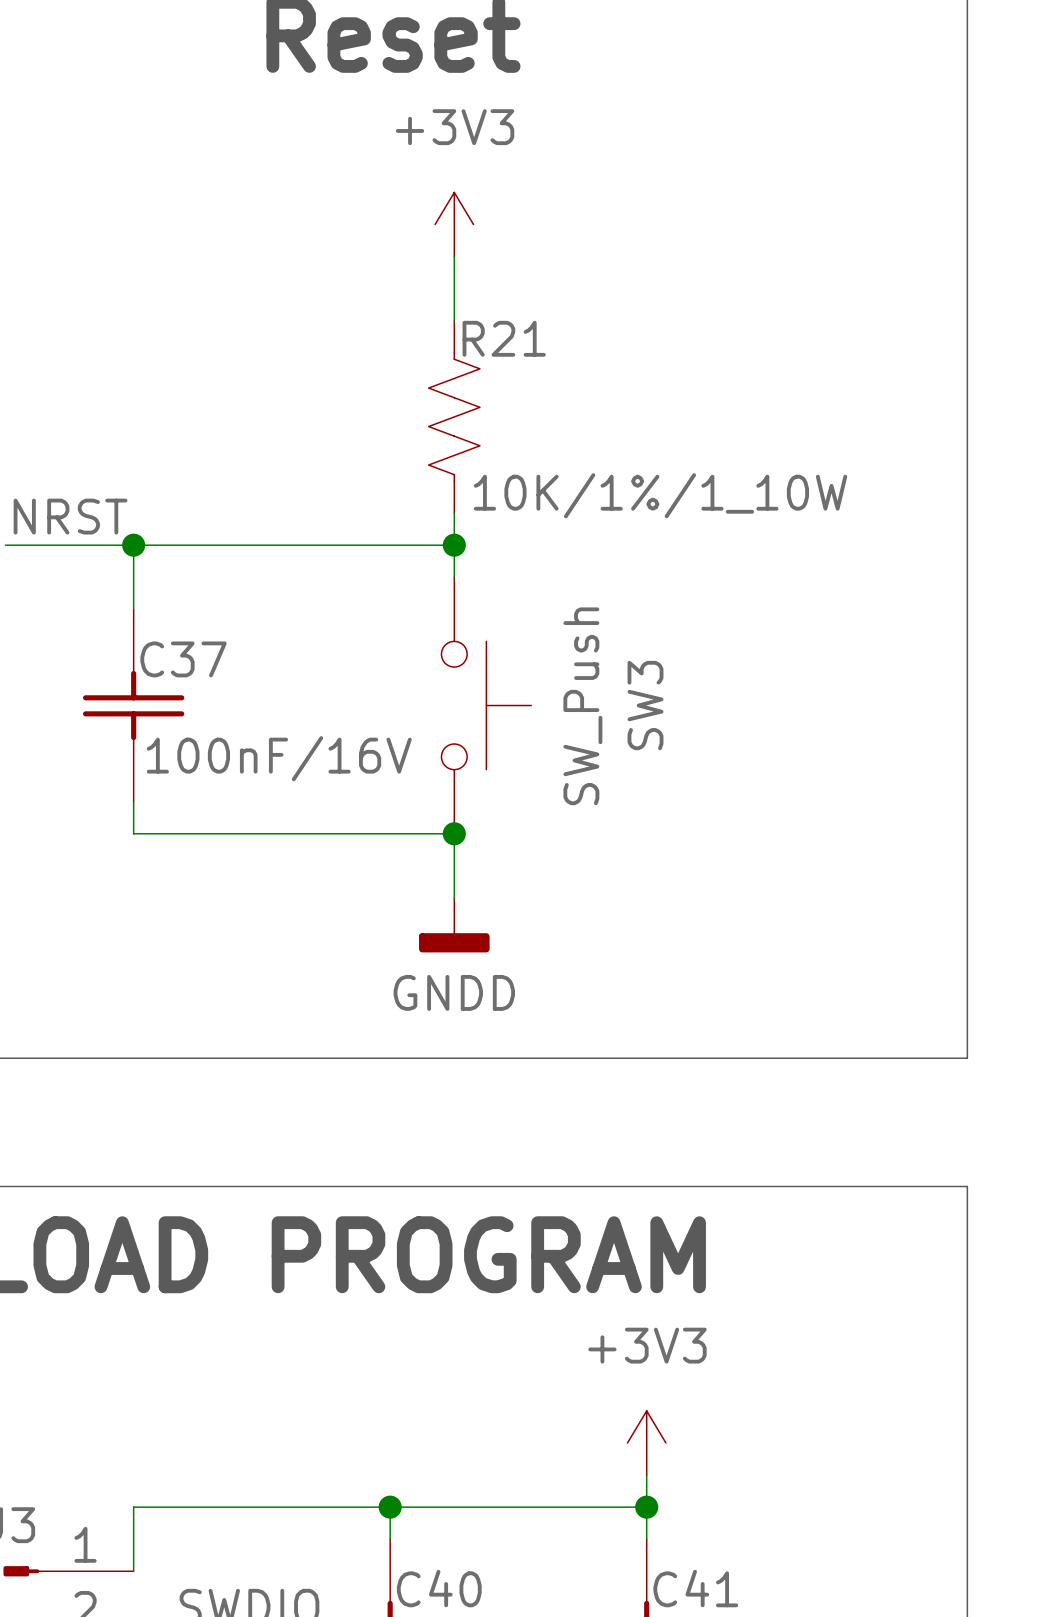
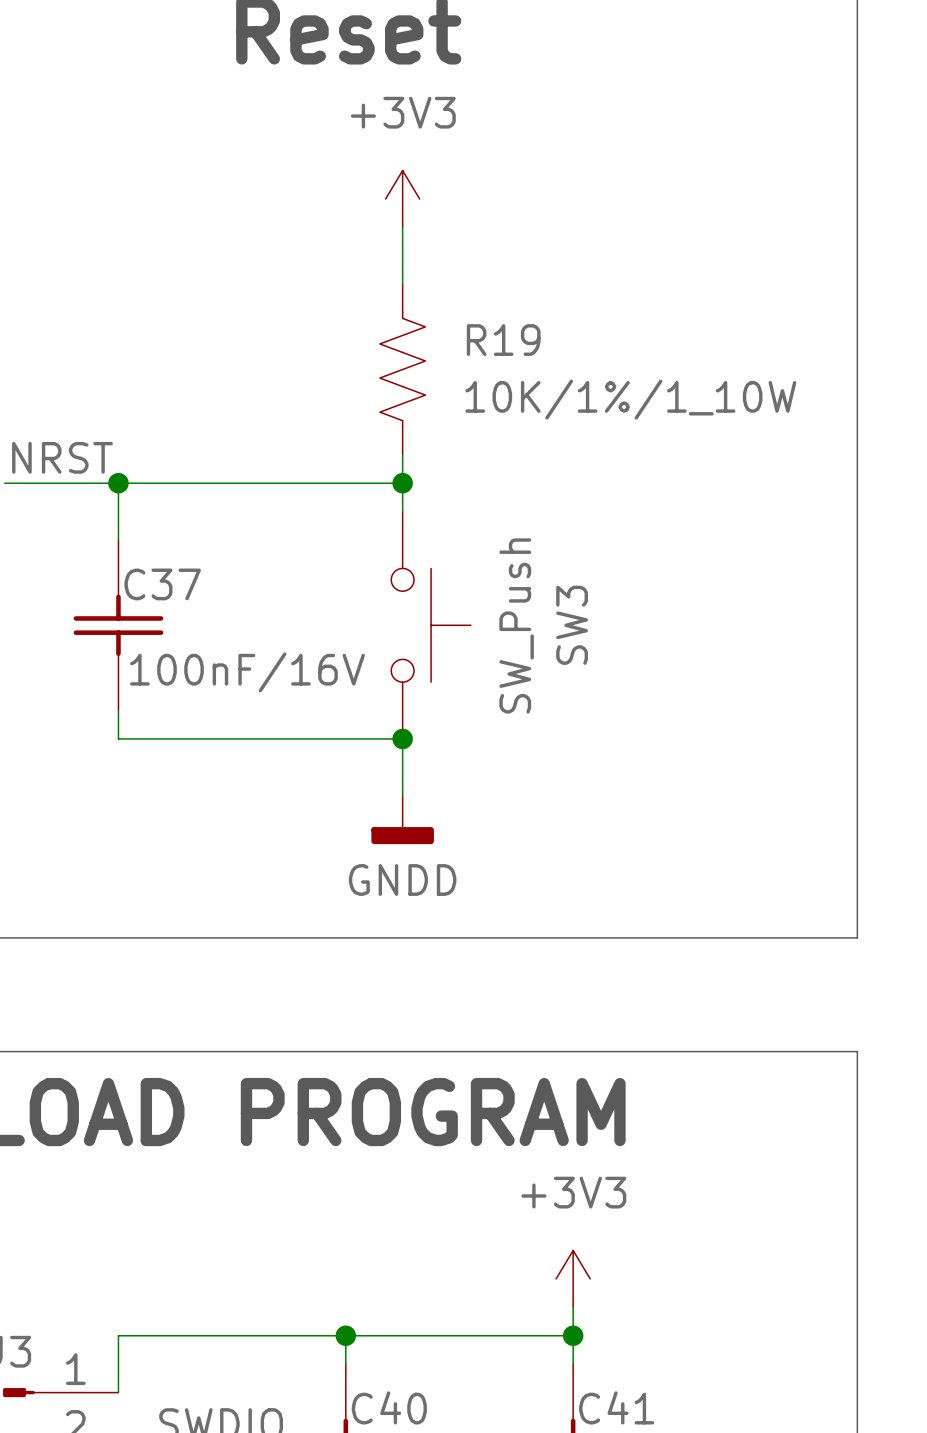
R21 name: R21 (504, 338) -> R19 (503, 340)
R21 value position: 10K/1%/1_10W (660, 495) -> 10K/1%/1_10W (630, 399)

